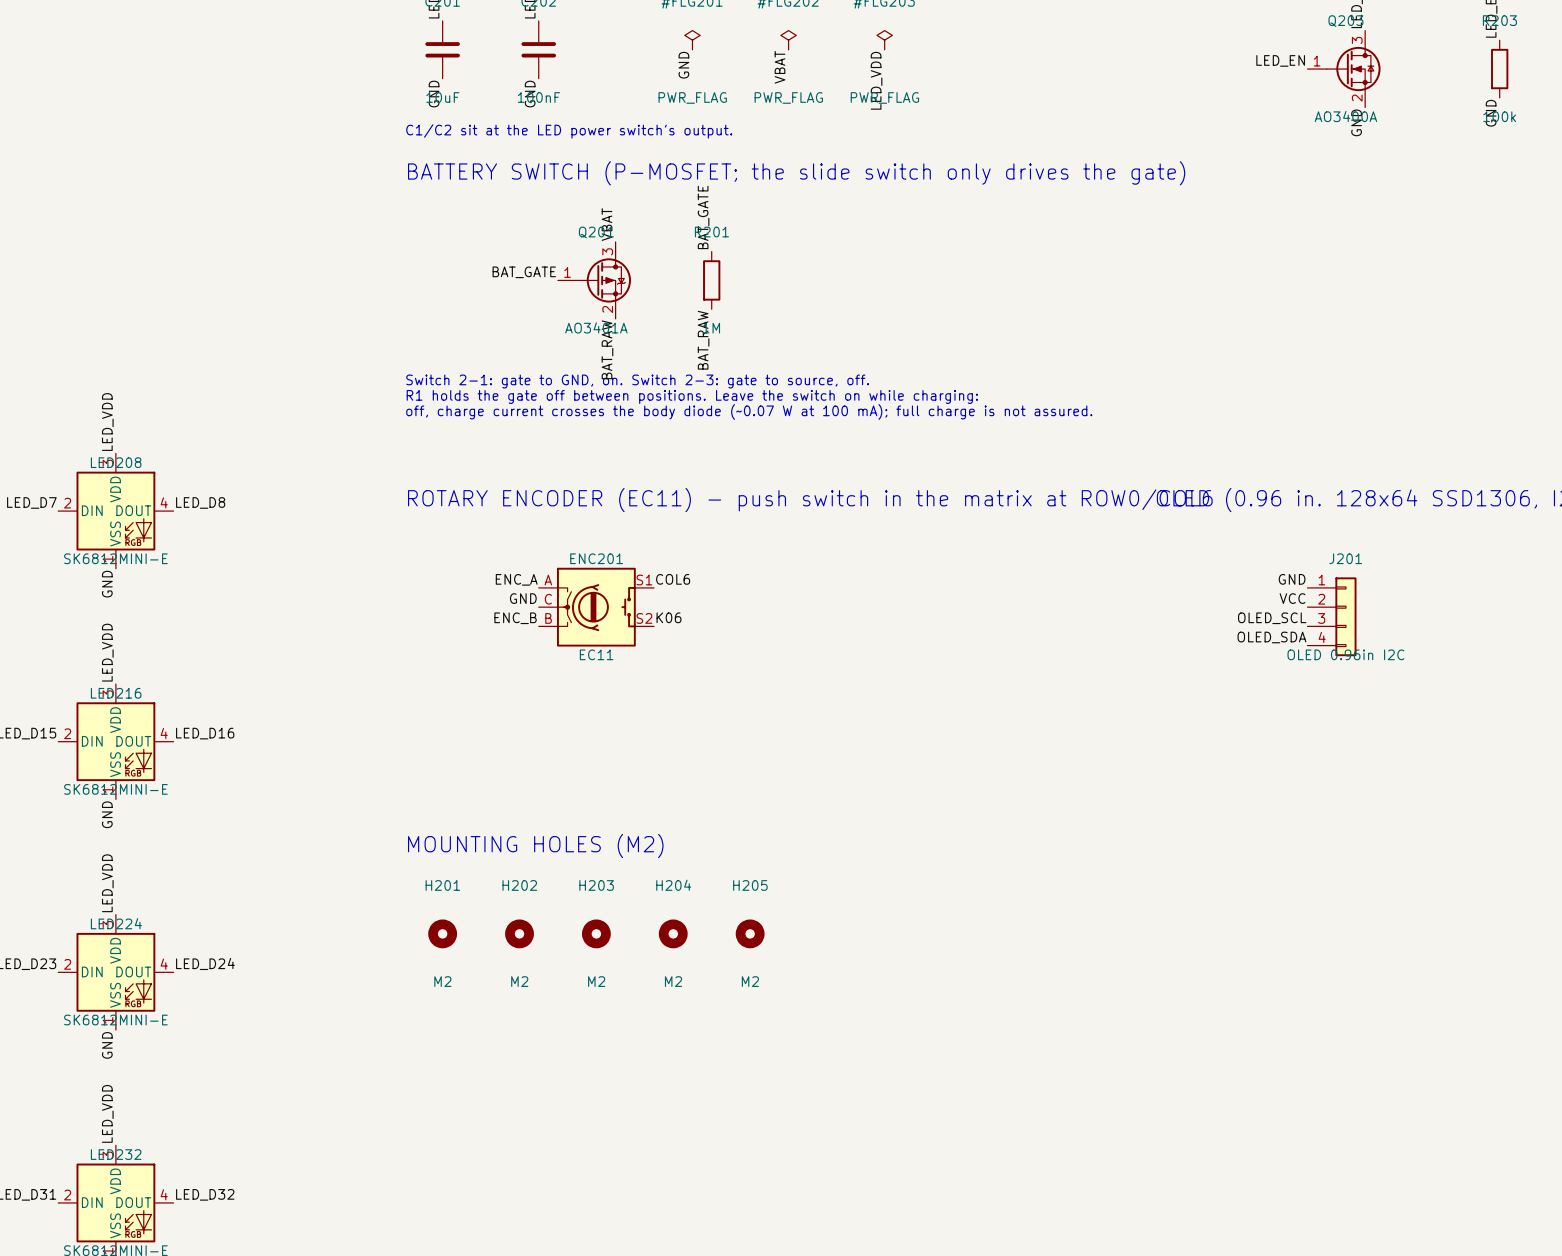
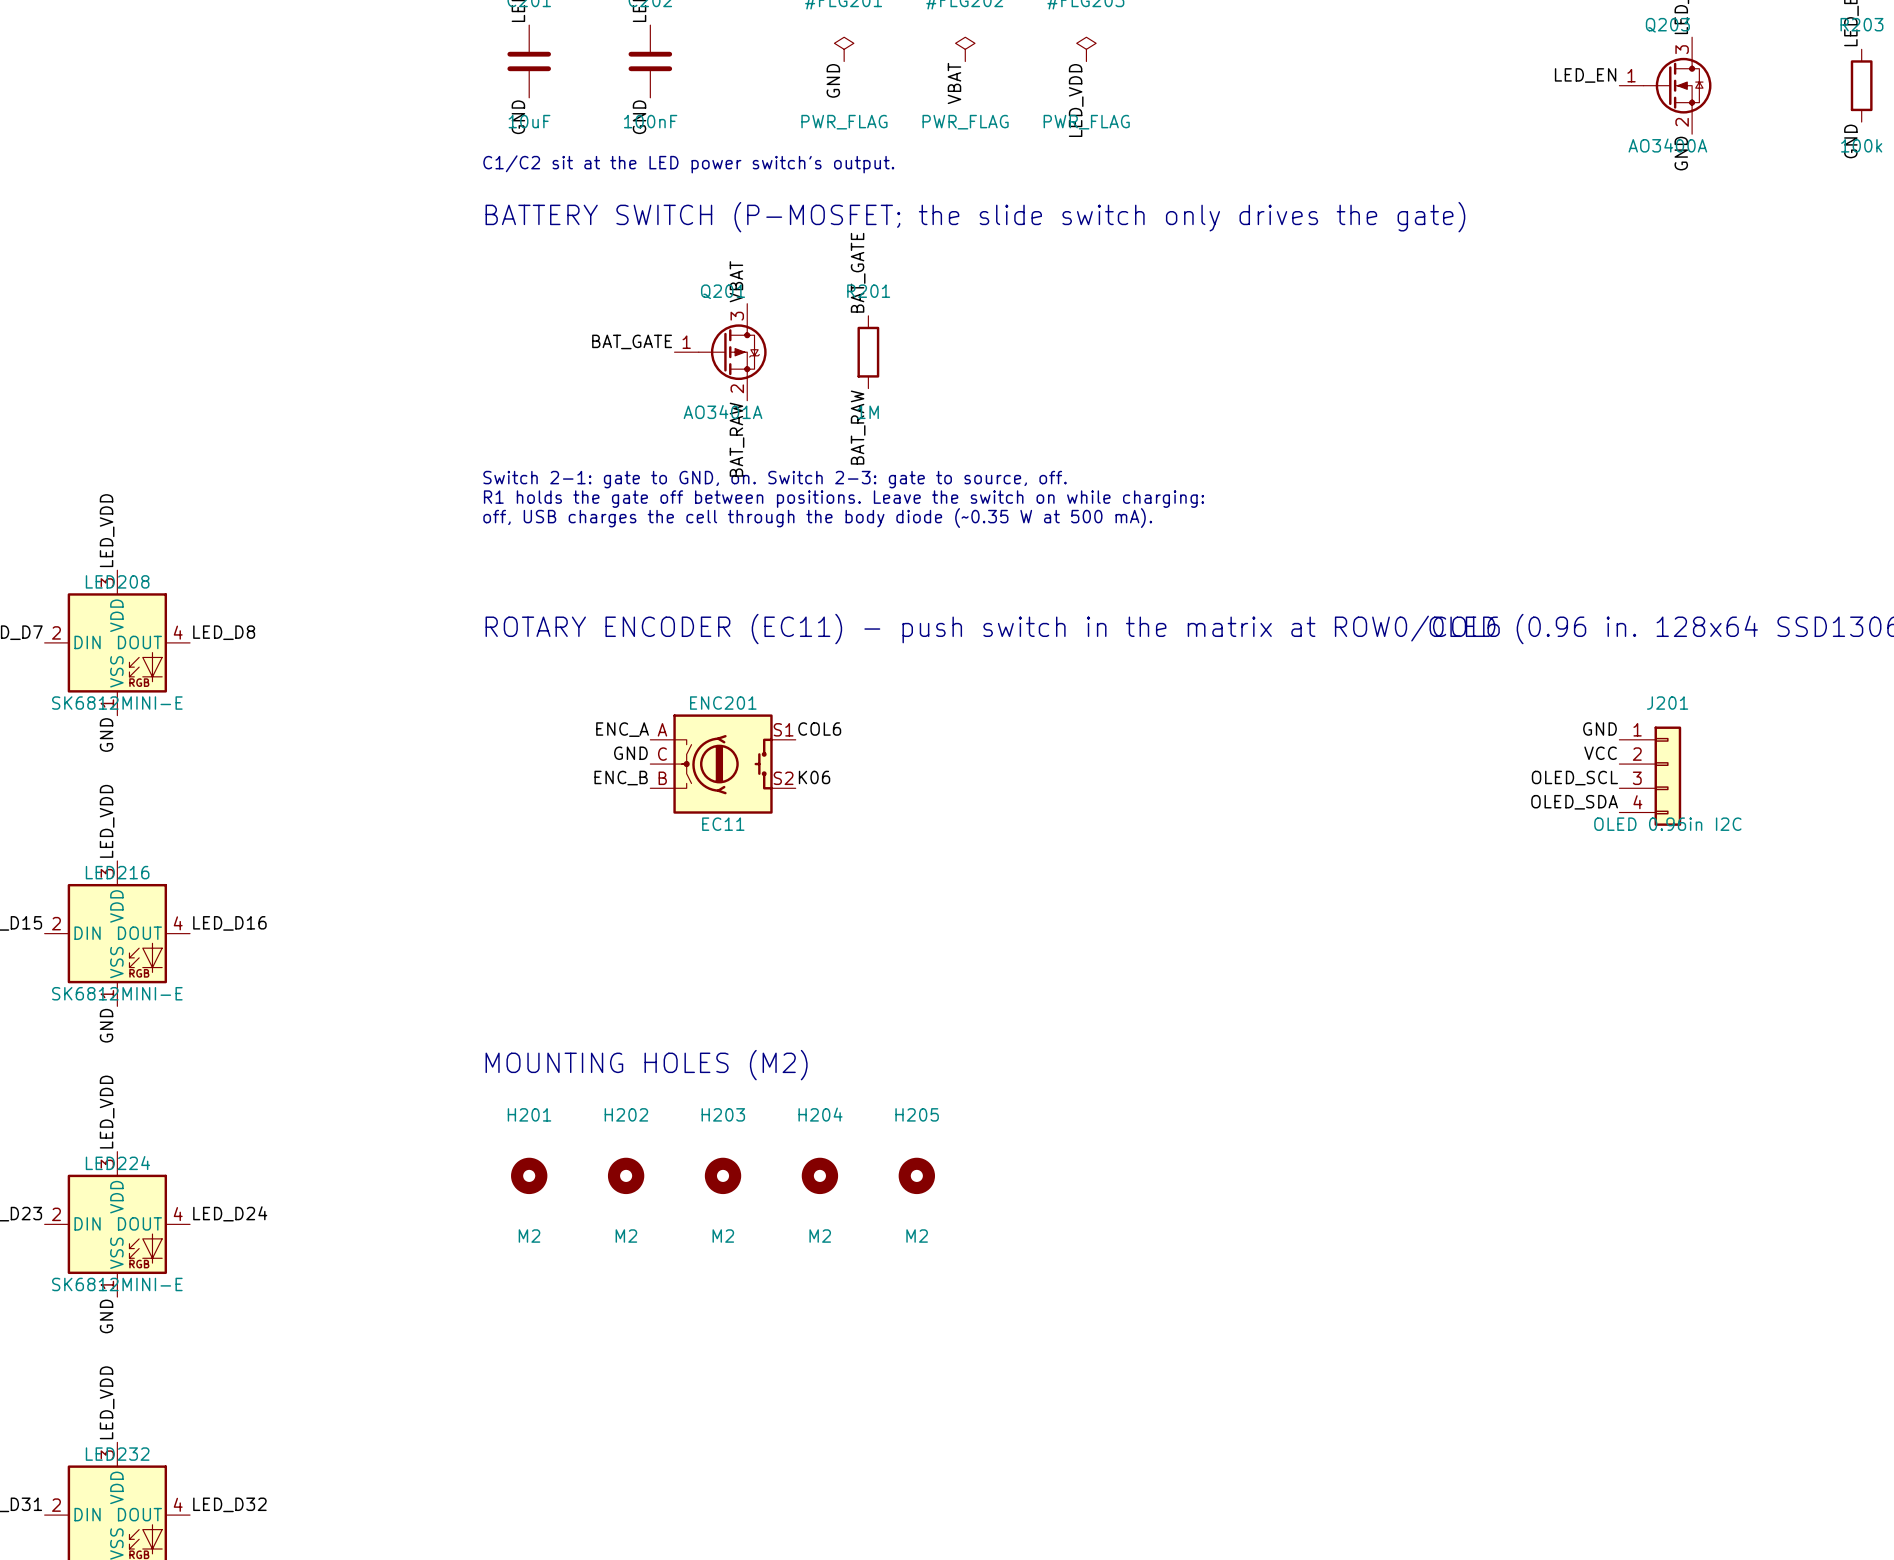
text: off, charge current crosses the body diode (~0.07 W at 100 mA); full charge is not assured. (749, 411) -> off, USB charges the cell through the body diode (~0.35 W at 500 mA). (817, 518)

